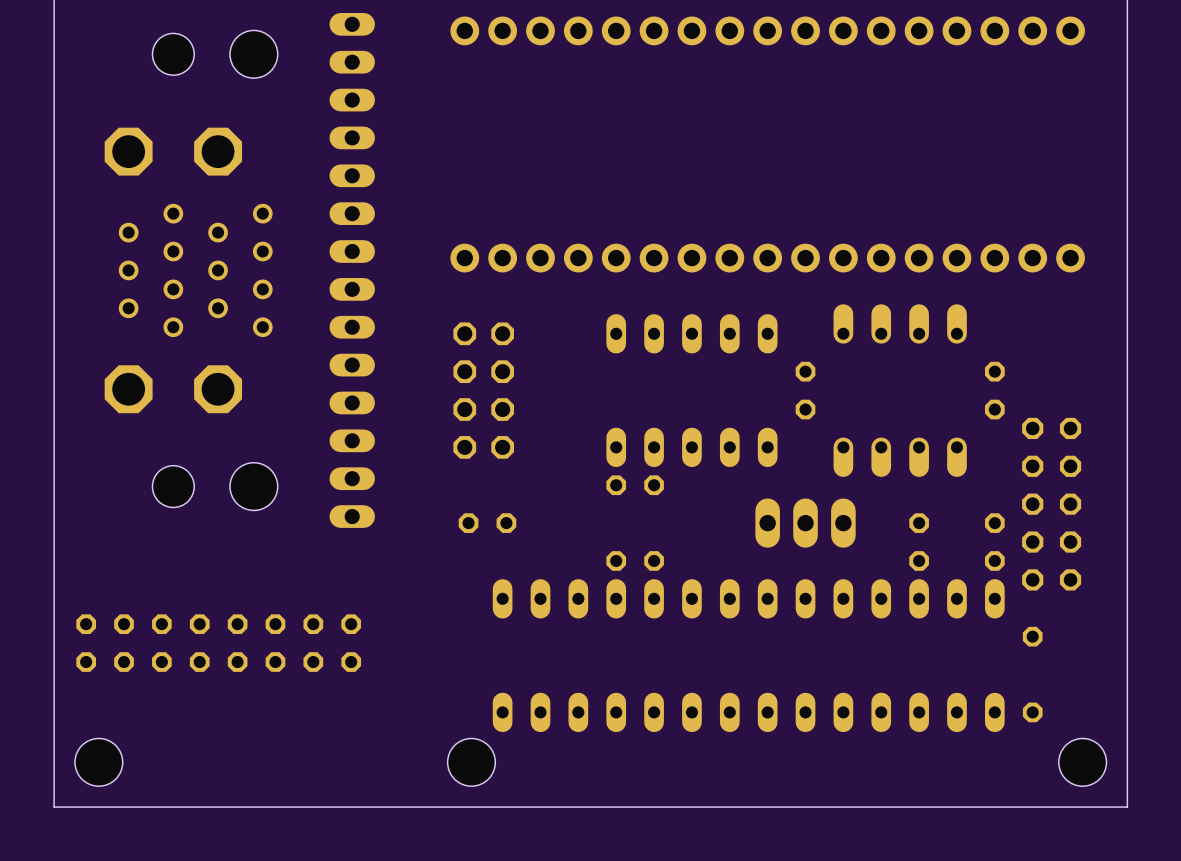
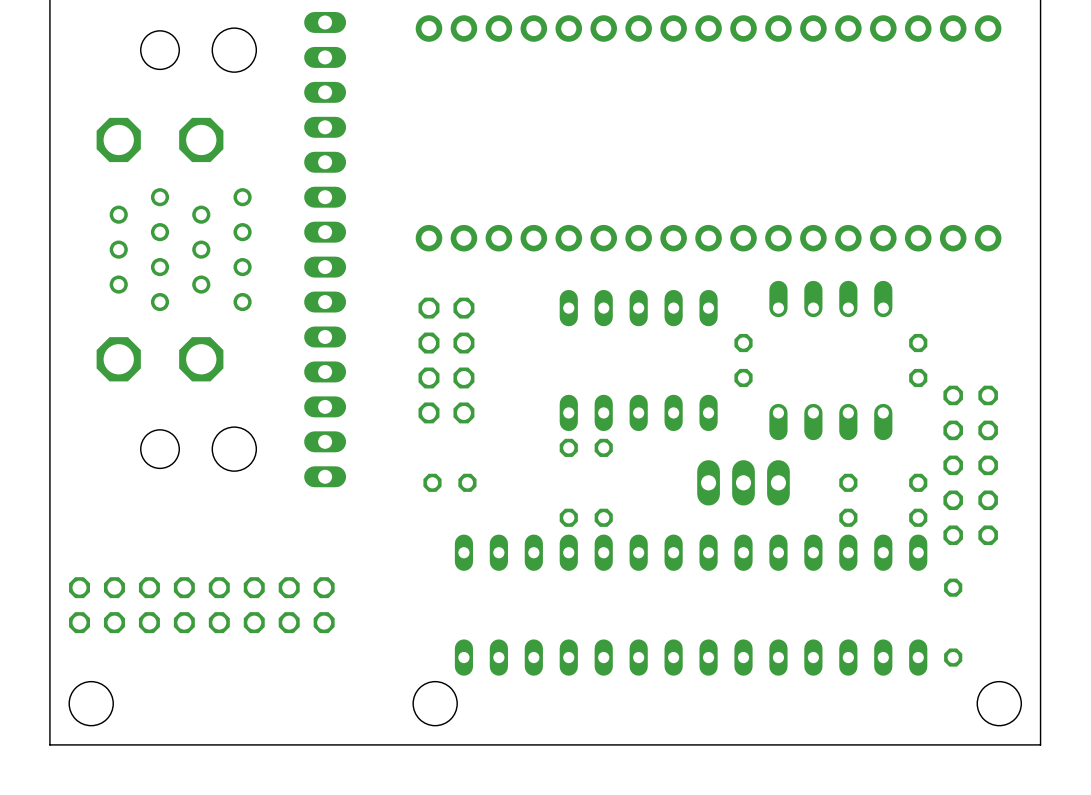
part footprint: [76, 614, 210, 672] -> [69, 577, 195, 634]
part footprint: [227, 614, 362, 672] -> [208, 577, 335, 634]

